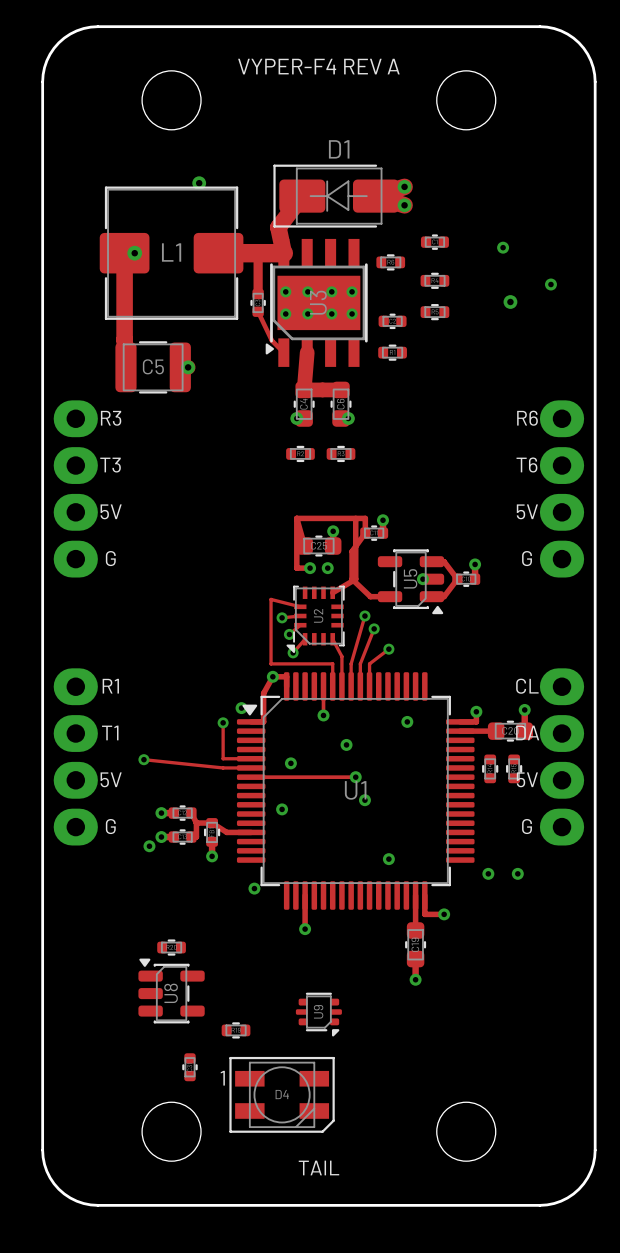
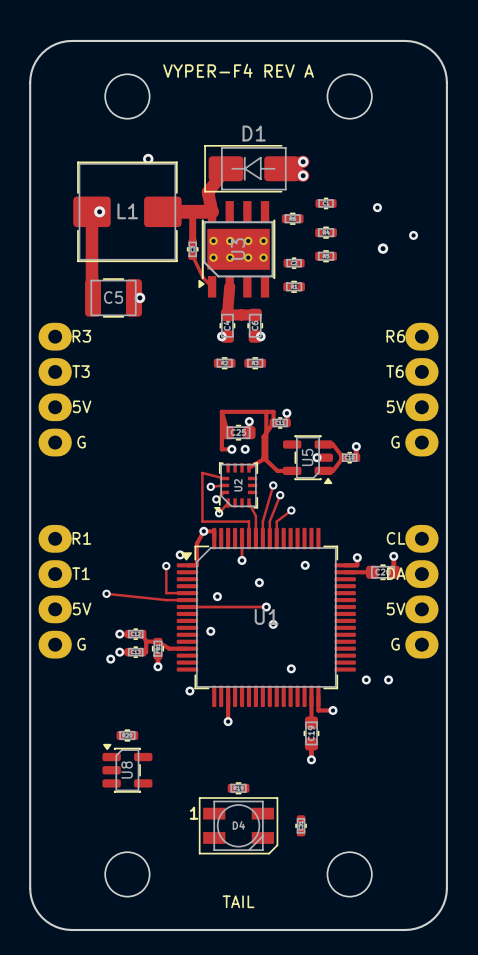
part: (490, 768) -> none
part: (514, 768) -> none
U9: (318, 1014) -> none
part position: (236, 1030) -> (238, 788)
part position: (189, 1067) -> (301, 825)
D4 position: (282, 1094) -> (238, 825)

